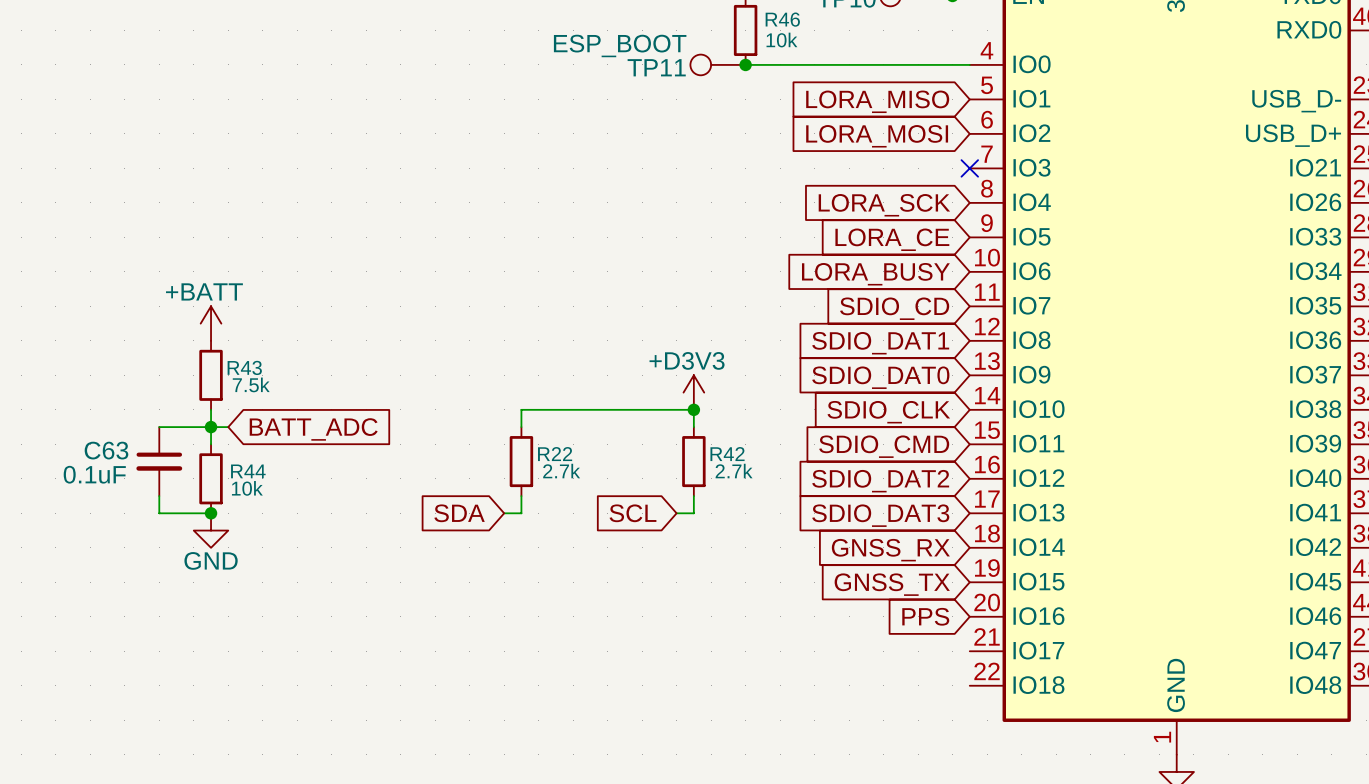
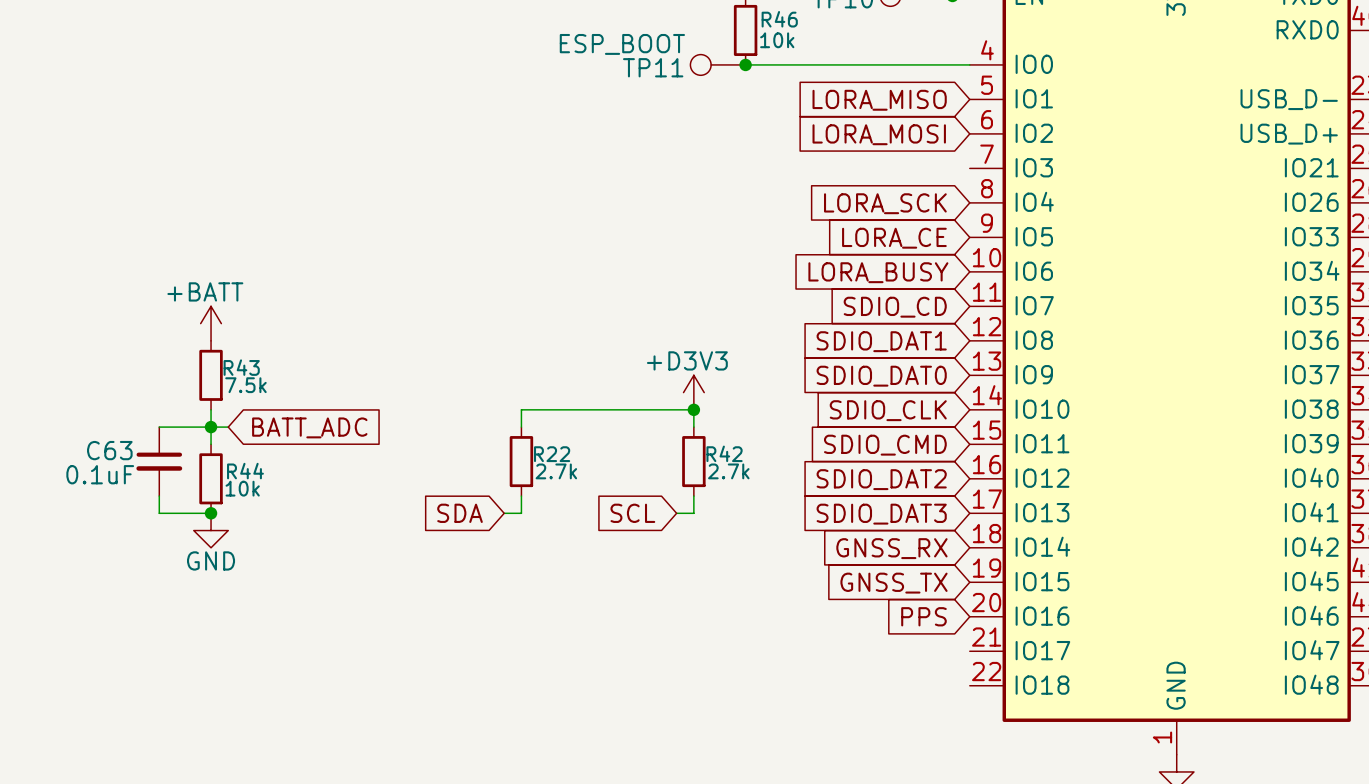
no-connect mark: (969, 168) -> none

